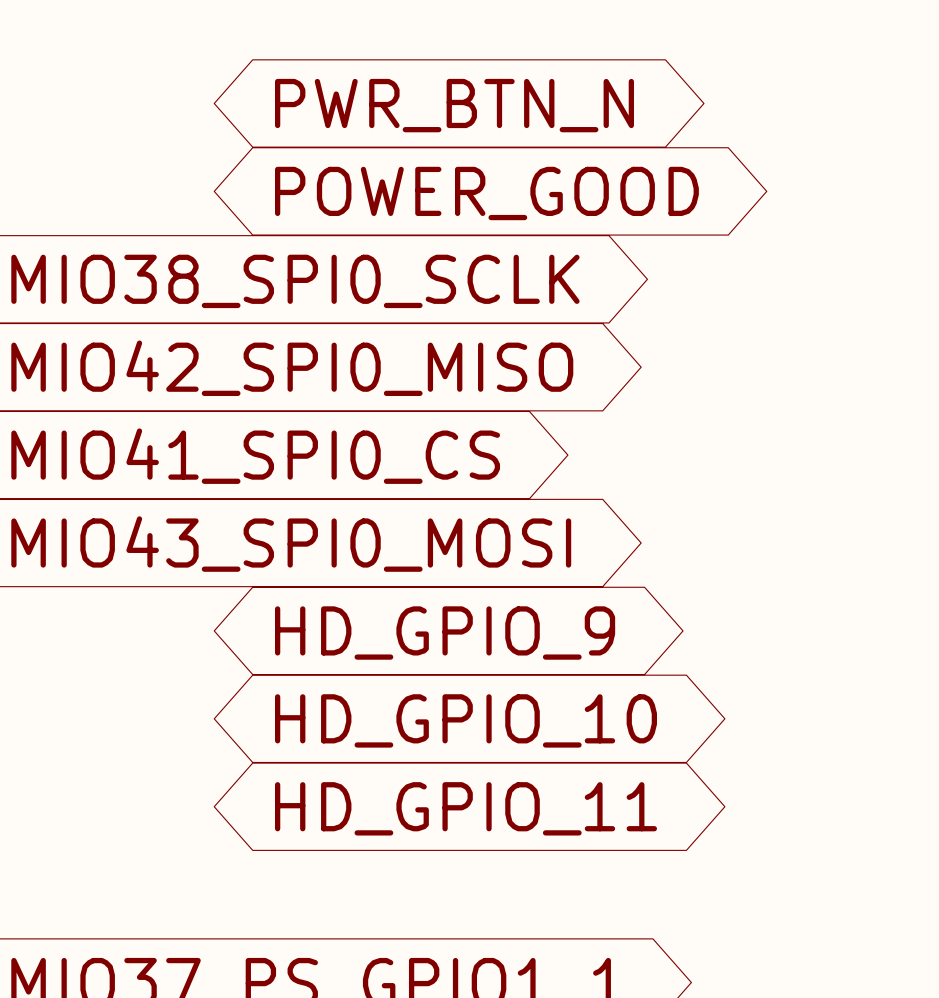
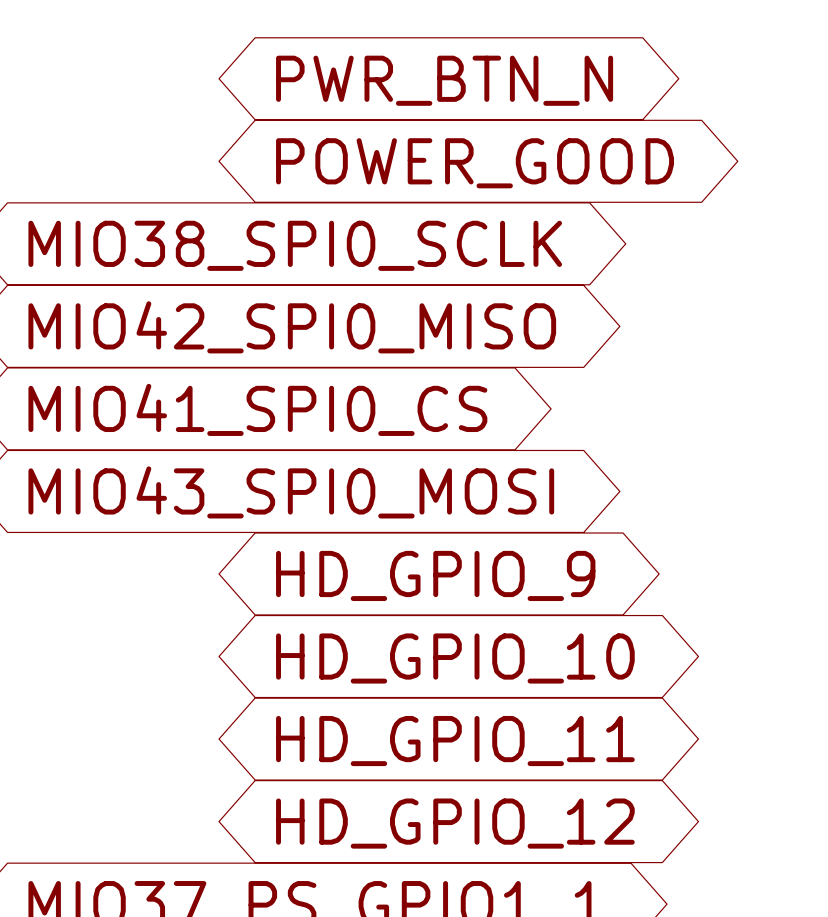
global label: none -> HD_GPIO_12 (455, 823)

